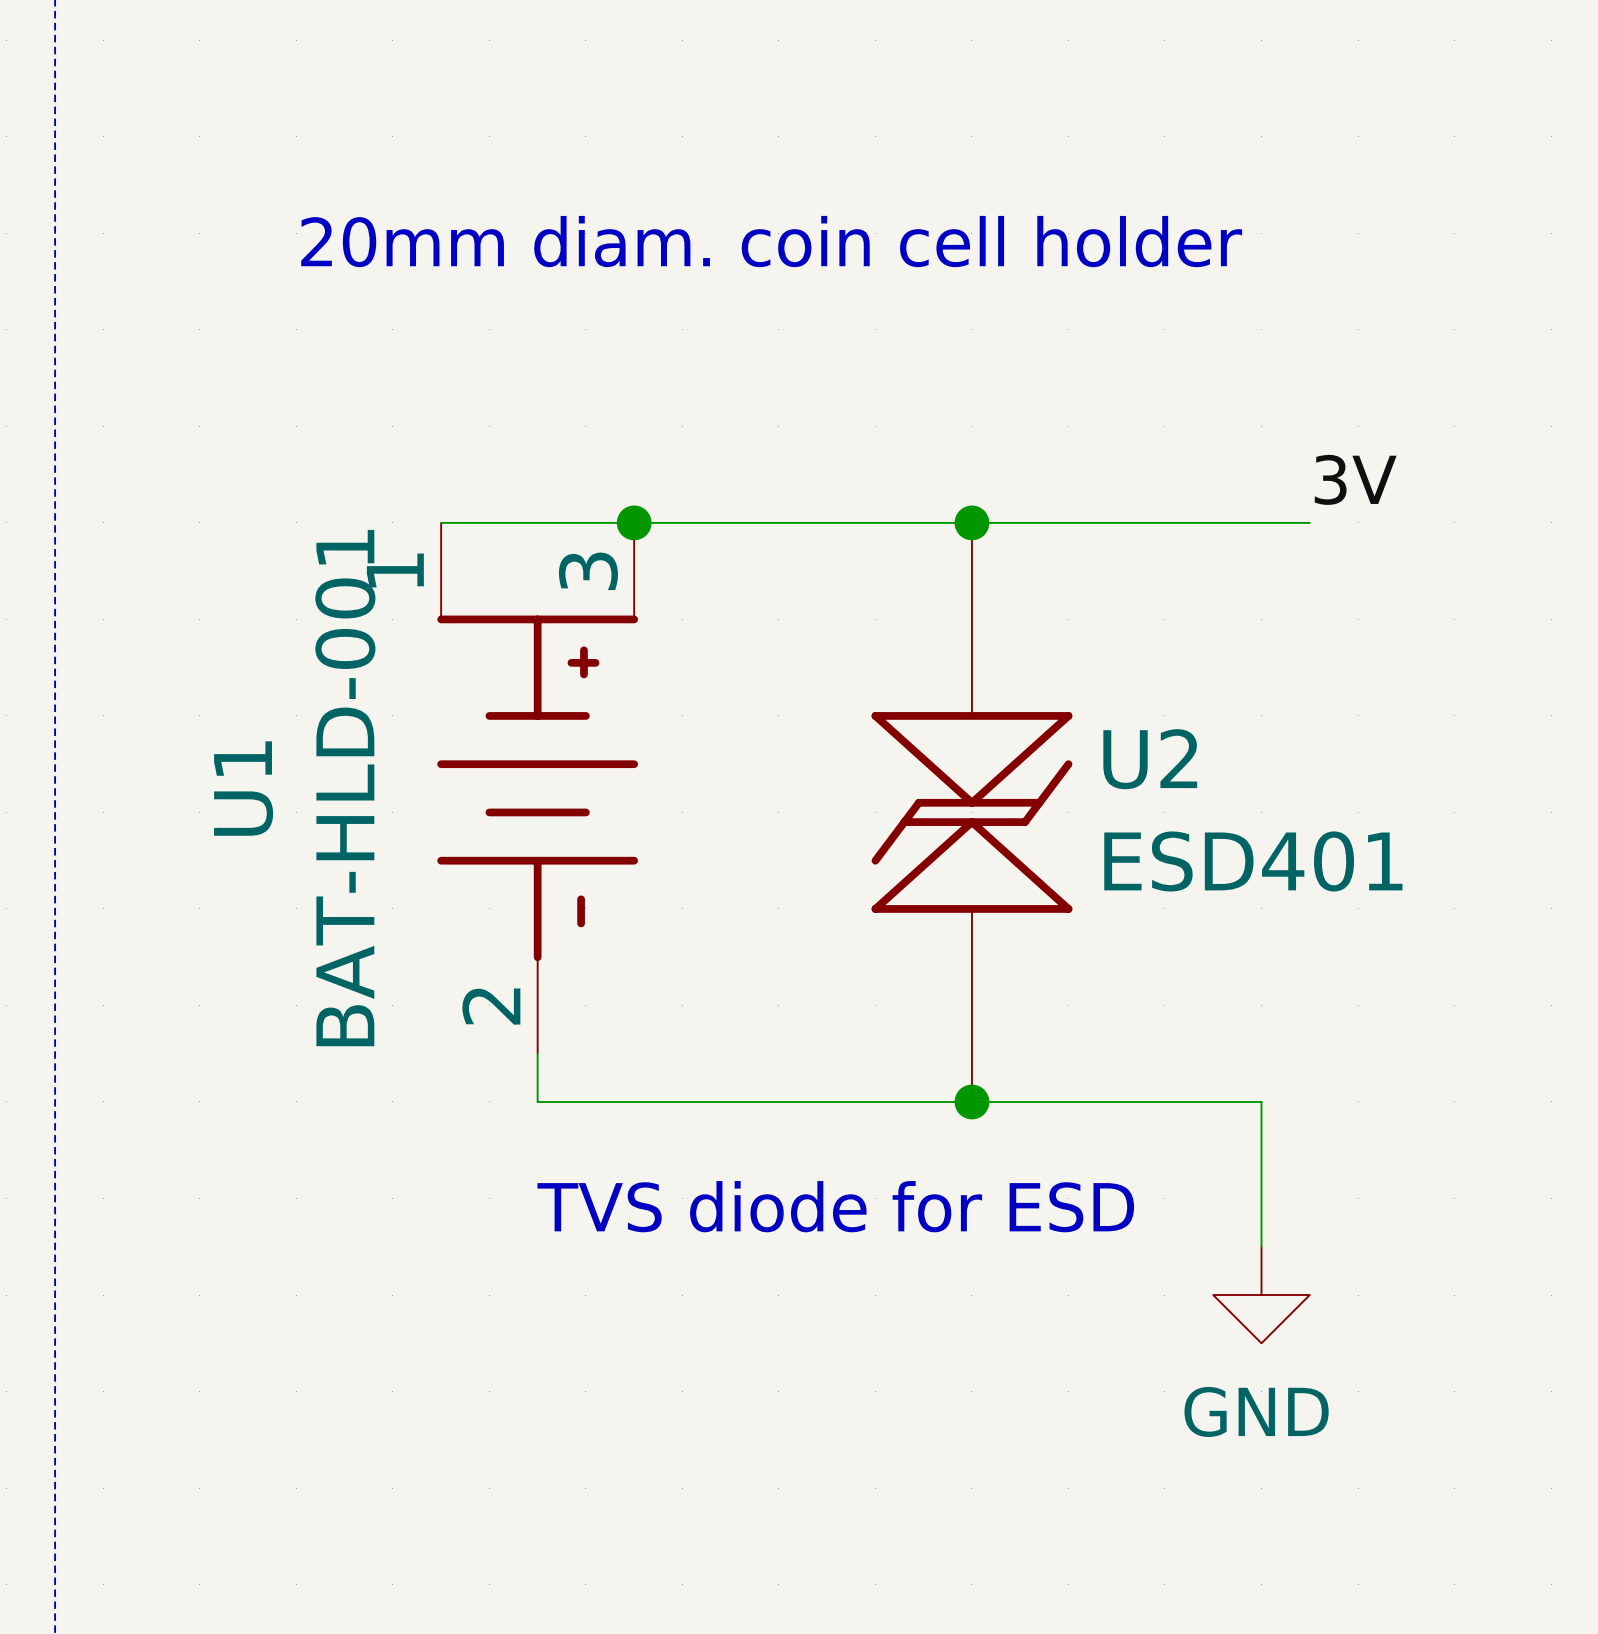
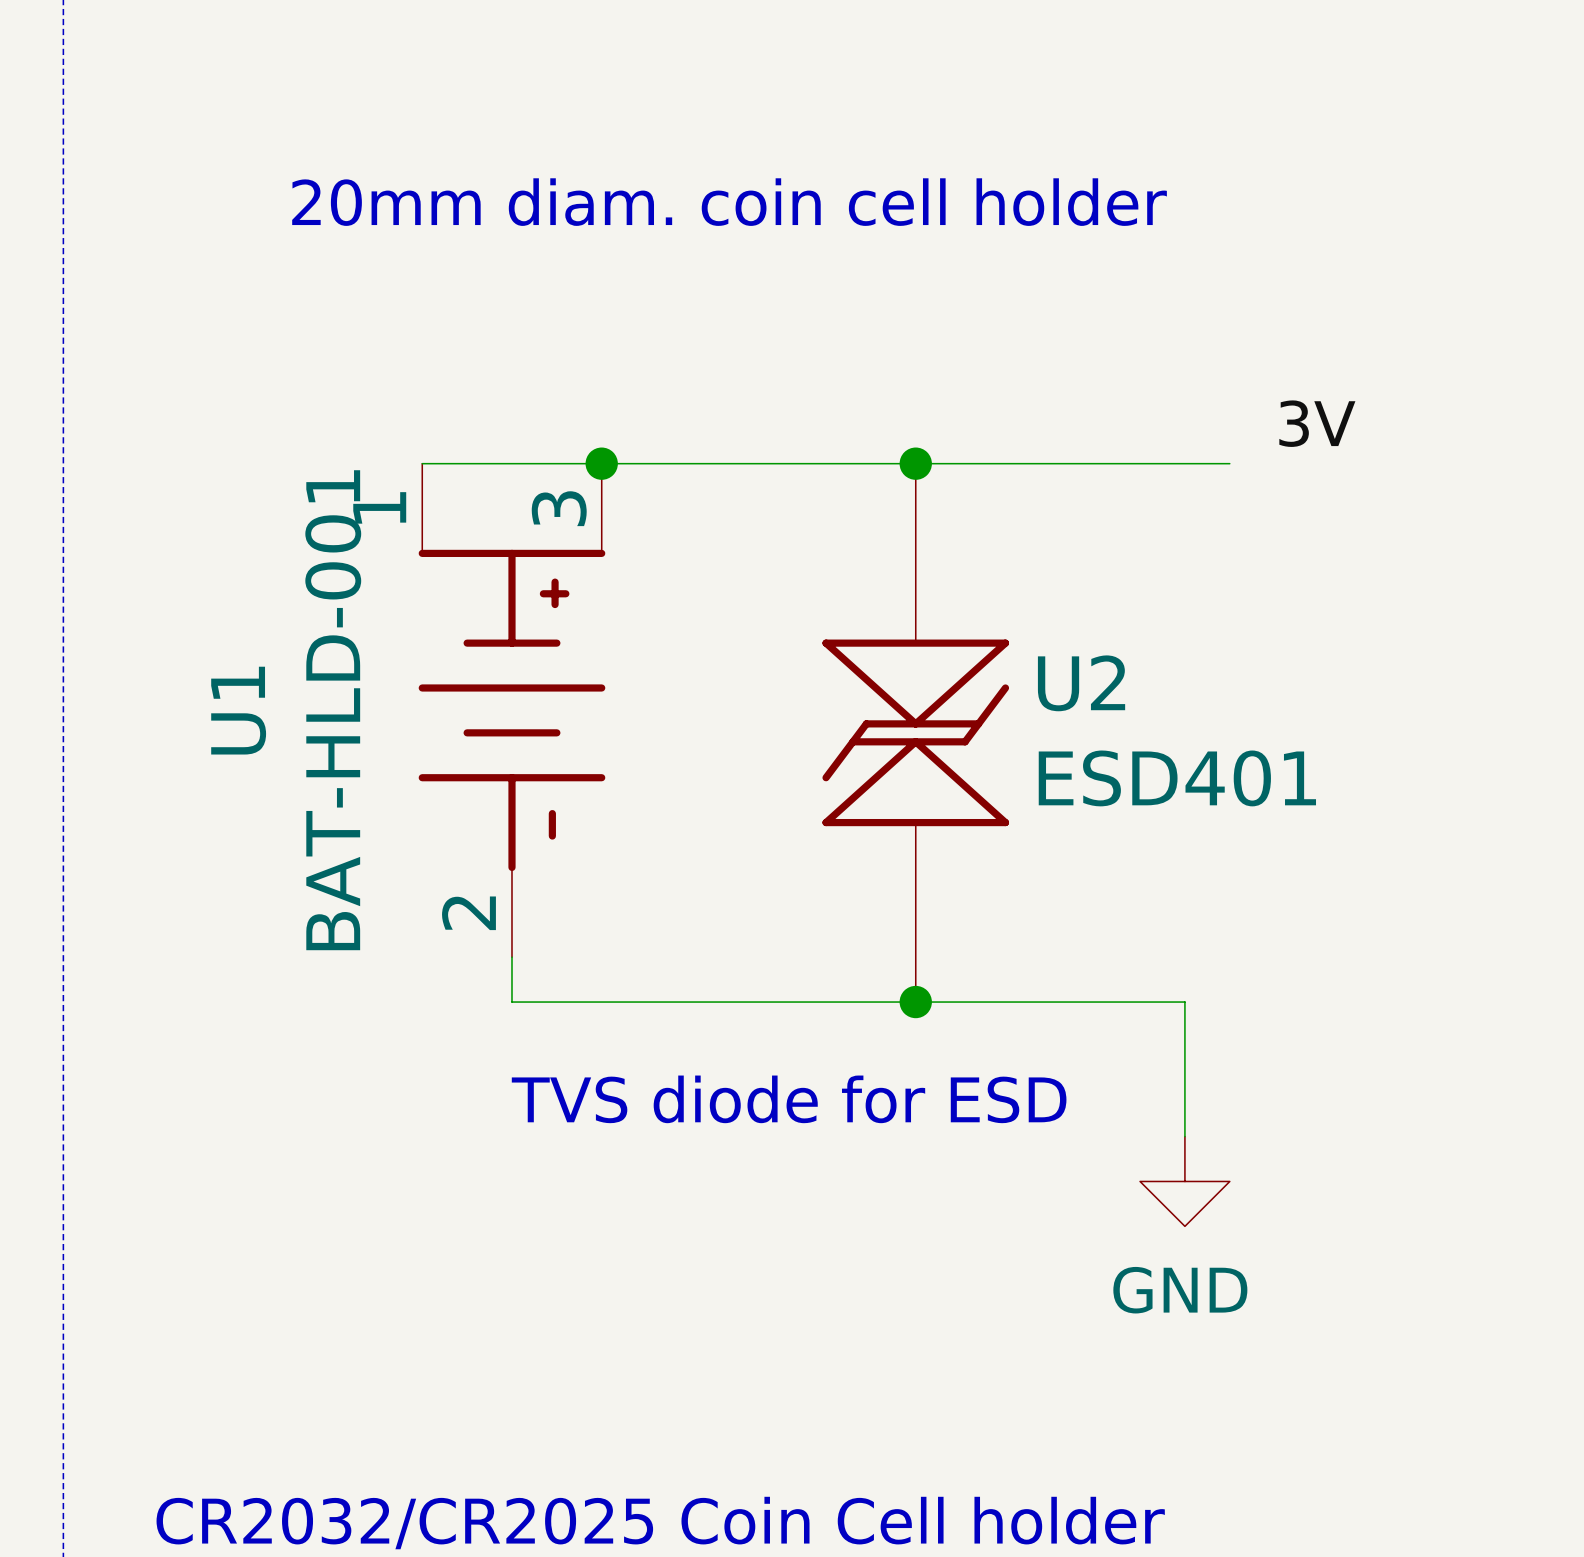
label position: 3V (1355, 479) -> 3V (1317, 423)

